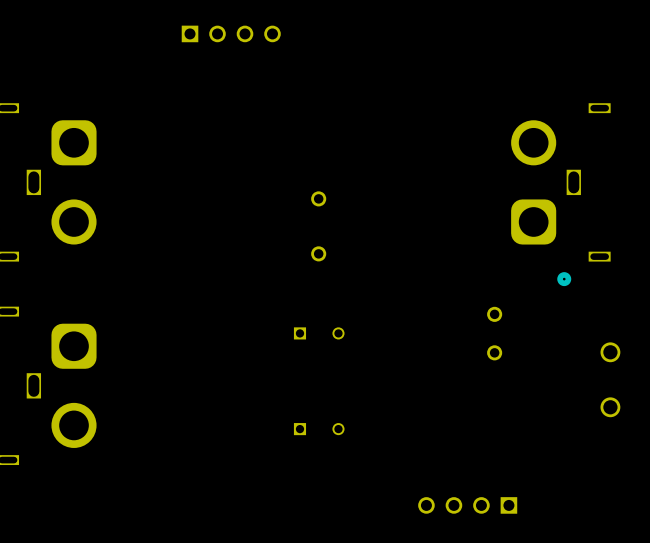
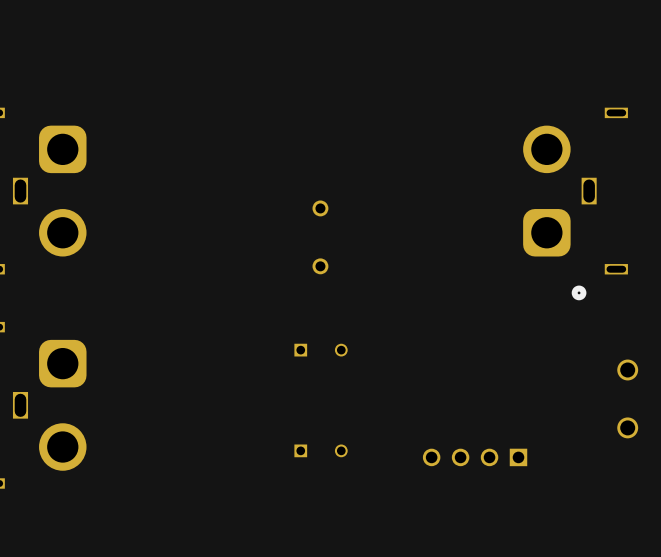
part: (231, 33) -> none
part: (494, 333) -> none
part position: (467, 505) -> (475, 457)

